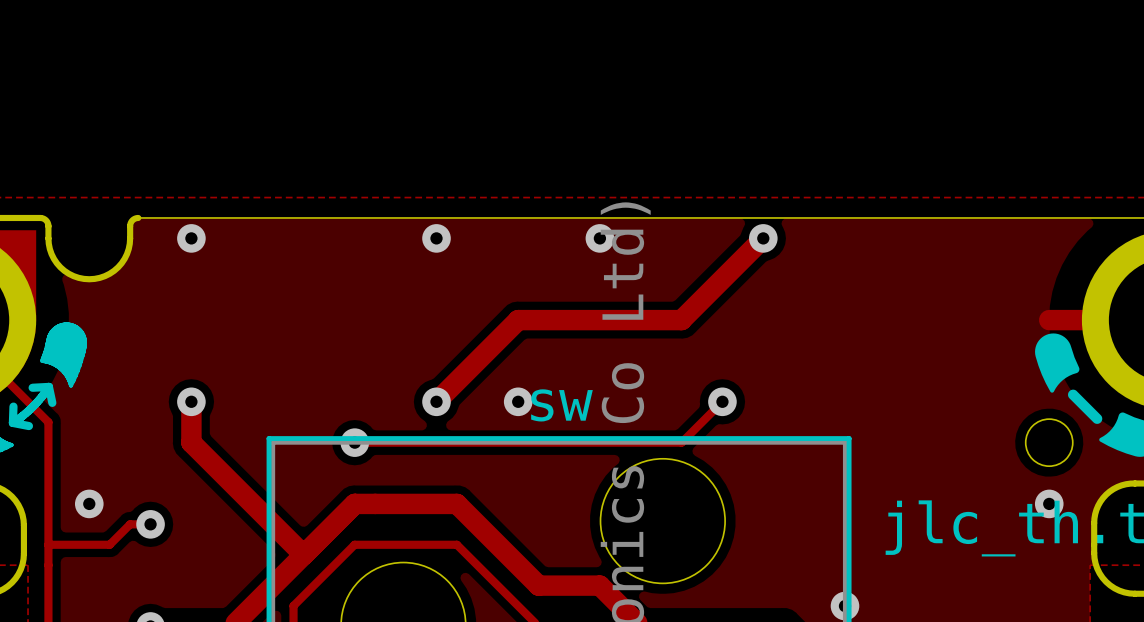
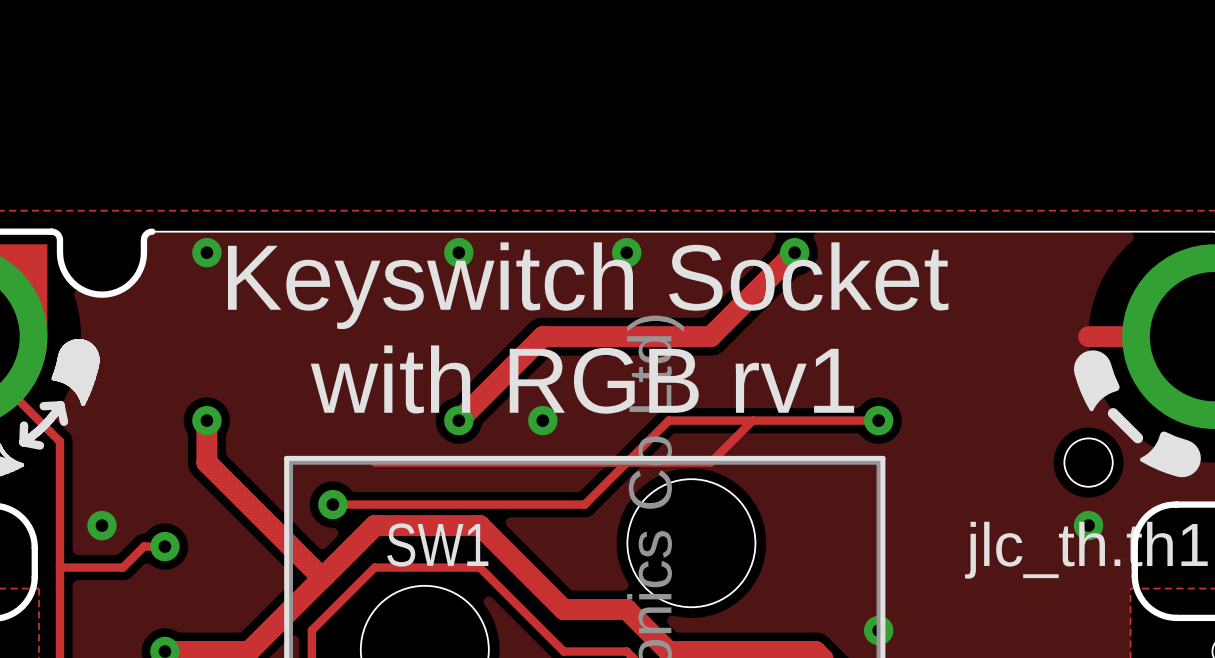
text: none -> Keyswitch Socket (588, 285)
text: none -> with RGB rv1 (582, 379)
via position: (722, 401) -> (878, 420)
track: none -> (878, 420) (668, 420) (584, 504) (332, 504)
sw name: sw (561, 405) -> SW1 (437, 544)
via position: (354, 442) -> (332, 504)

